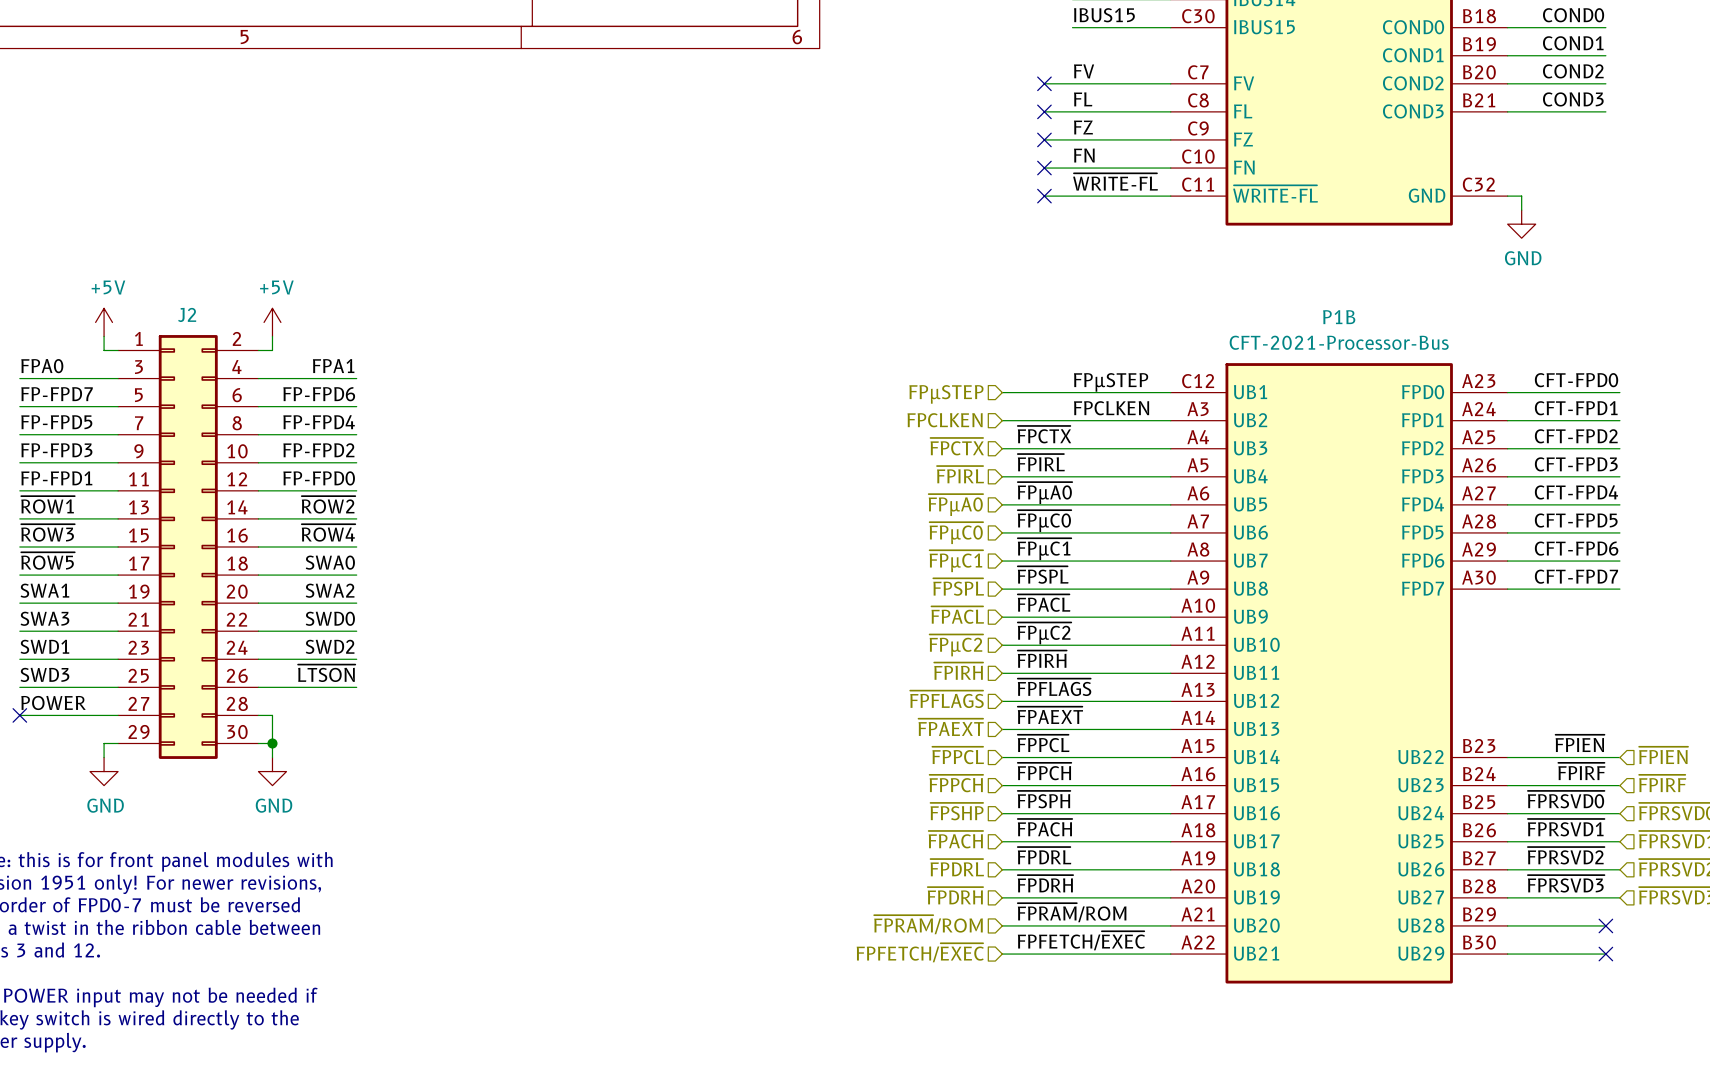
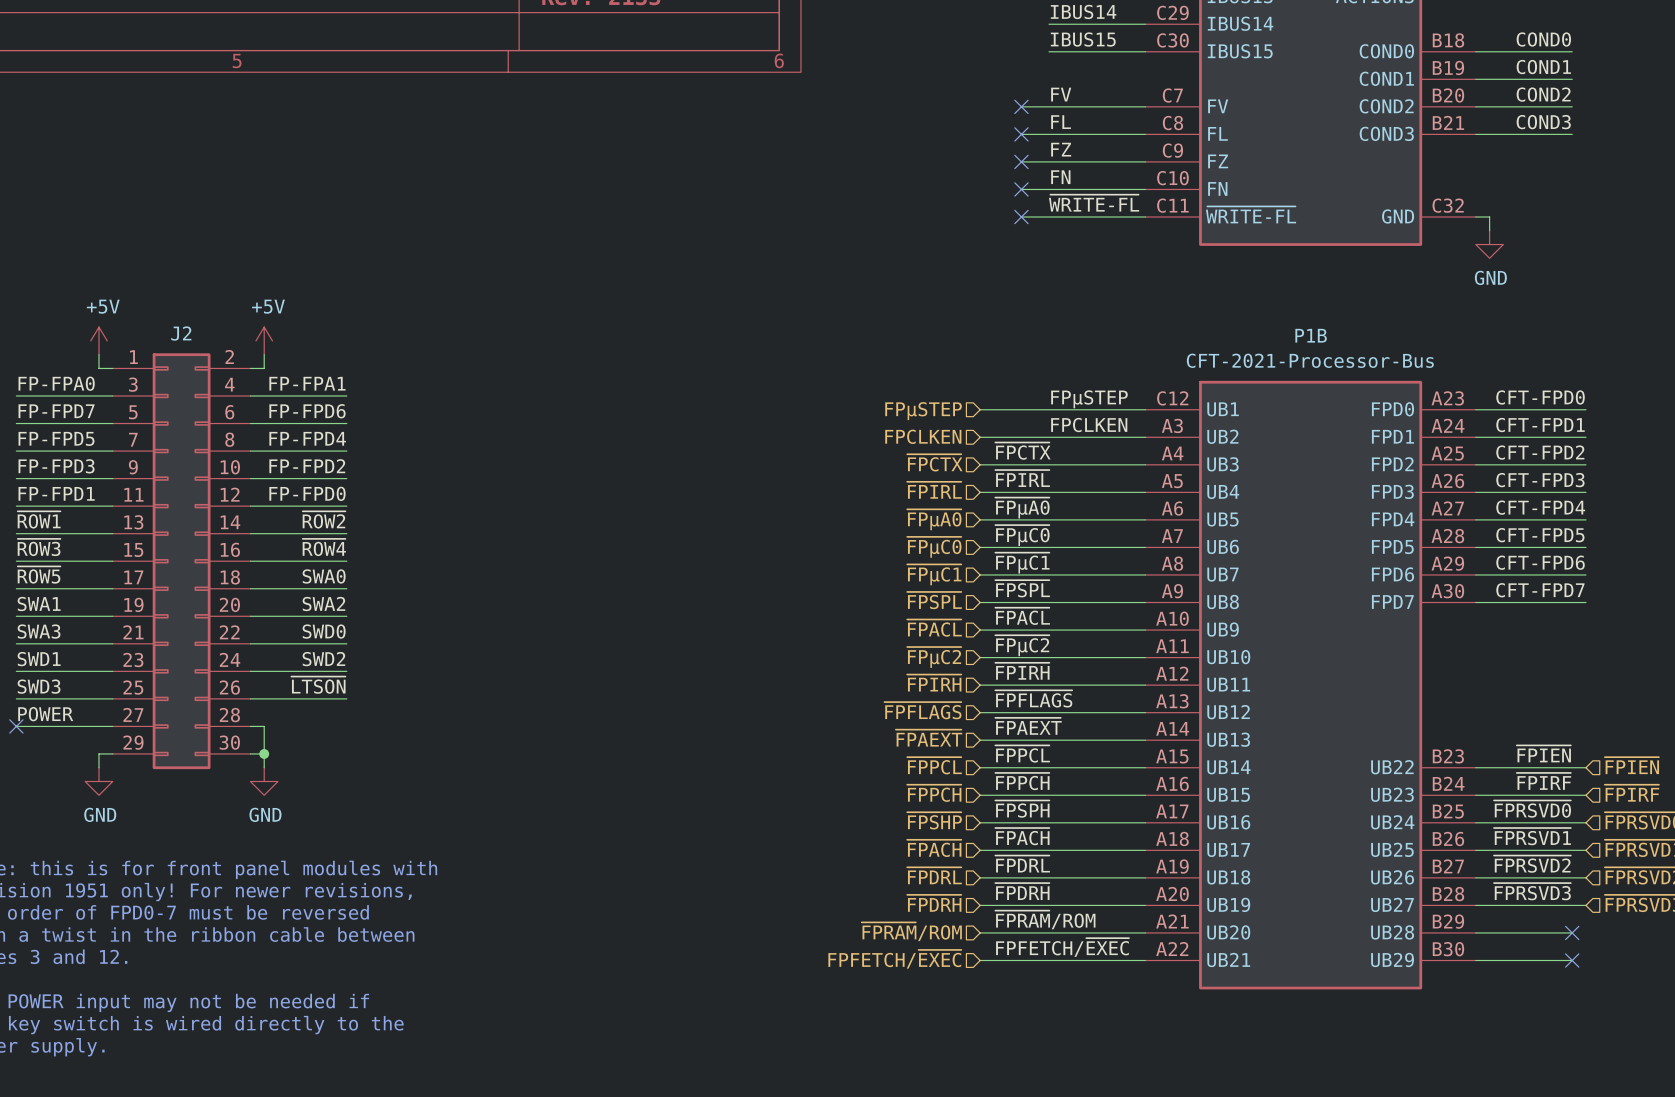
label: FPA0 (42, 366) -> FP-FPA0 (56, 383)
label: FPA1 (333, 366) -> FP-FPA1 (307, 383)

